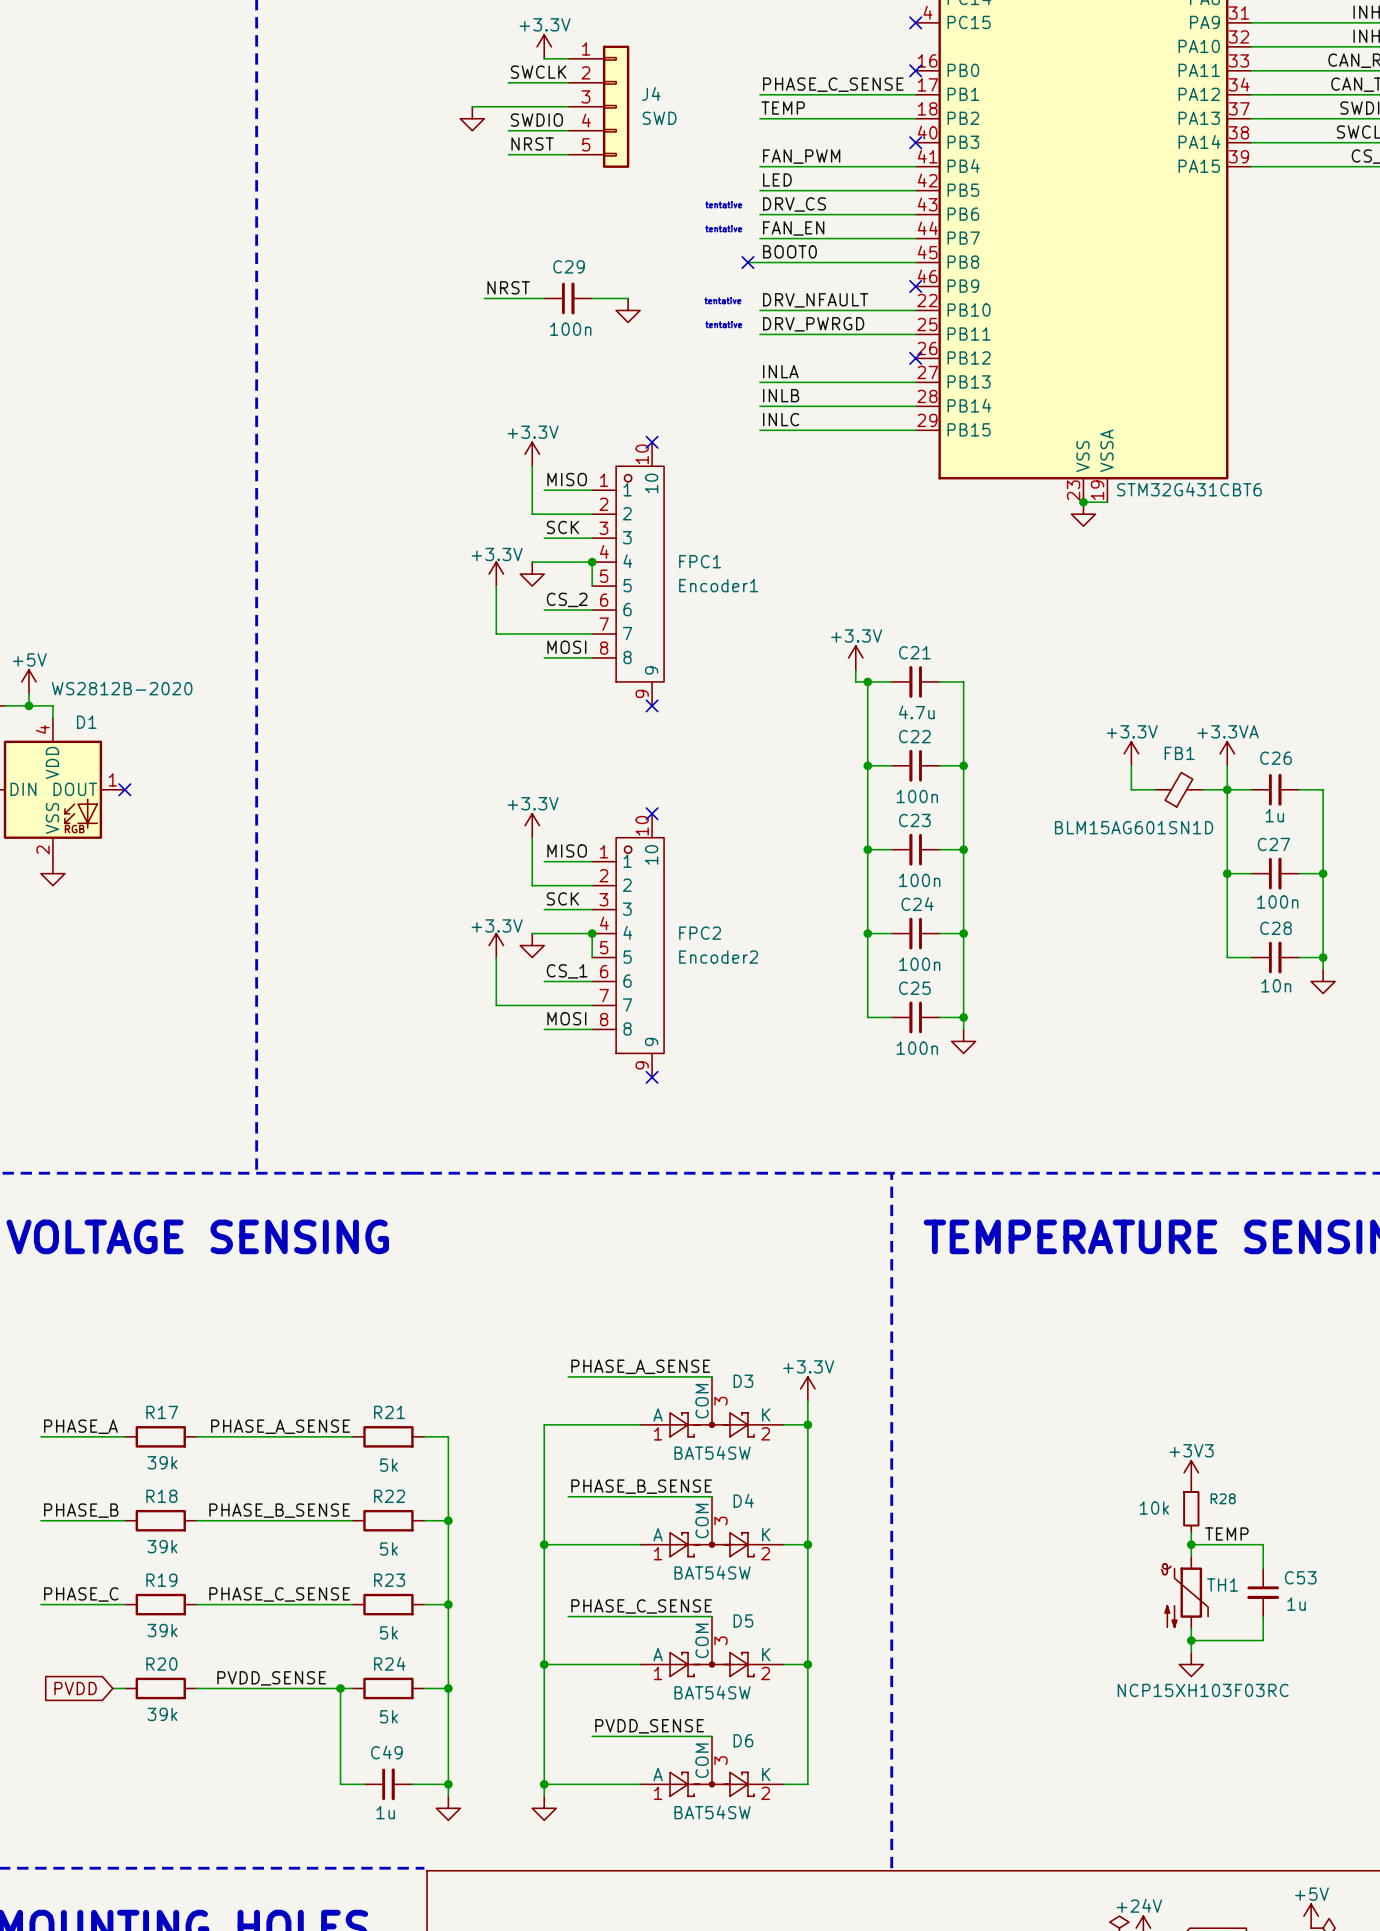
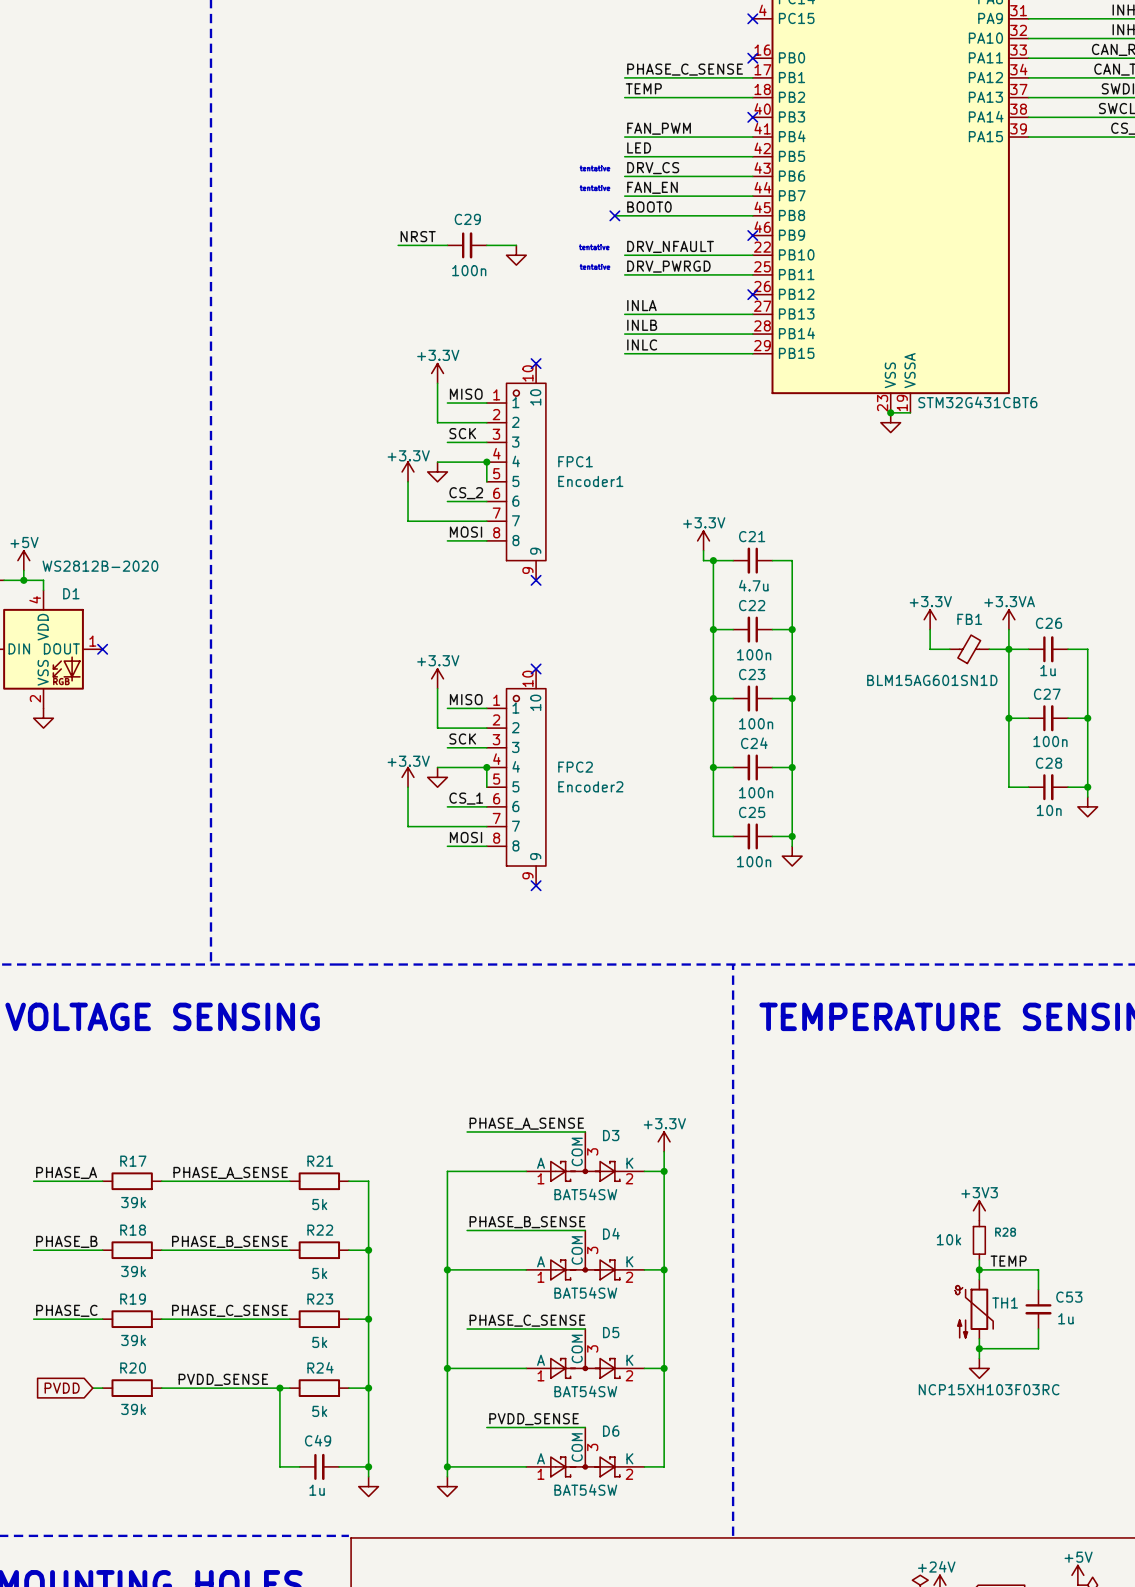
power symbol: +3.3V (544, 46) -> none
wire: (544, 58) (568, 58) -> none
label: SWCLK (538, 72) -> none
wire: (508, 82) (568, 82) -> none
wire: (472, 106) (568, 106) -> none
J4: SWD (598, 106) -> none
power symbol: (472, 118) -> none
label: SWDIO (536, 120) -> none
wire: (508, 130) (568, 130) -> none
label: NRST (532, 144) -> none
wire: (508, 154) (568, 154) -> none

